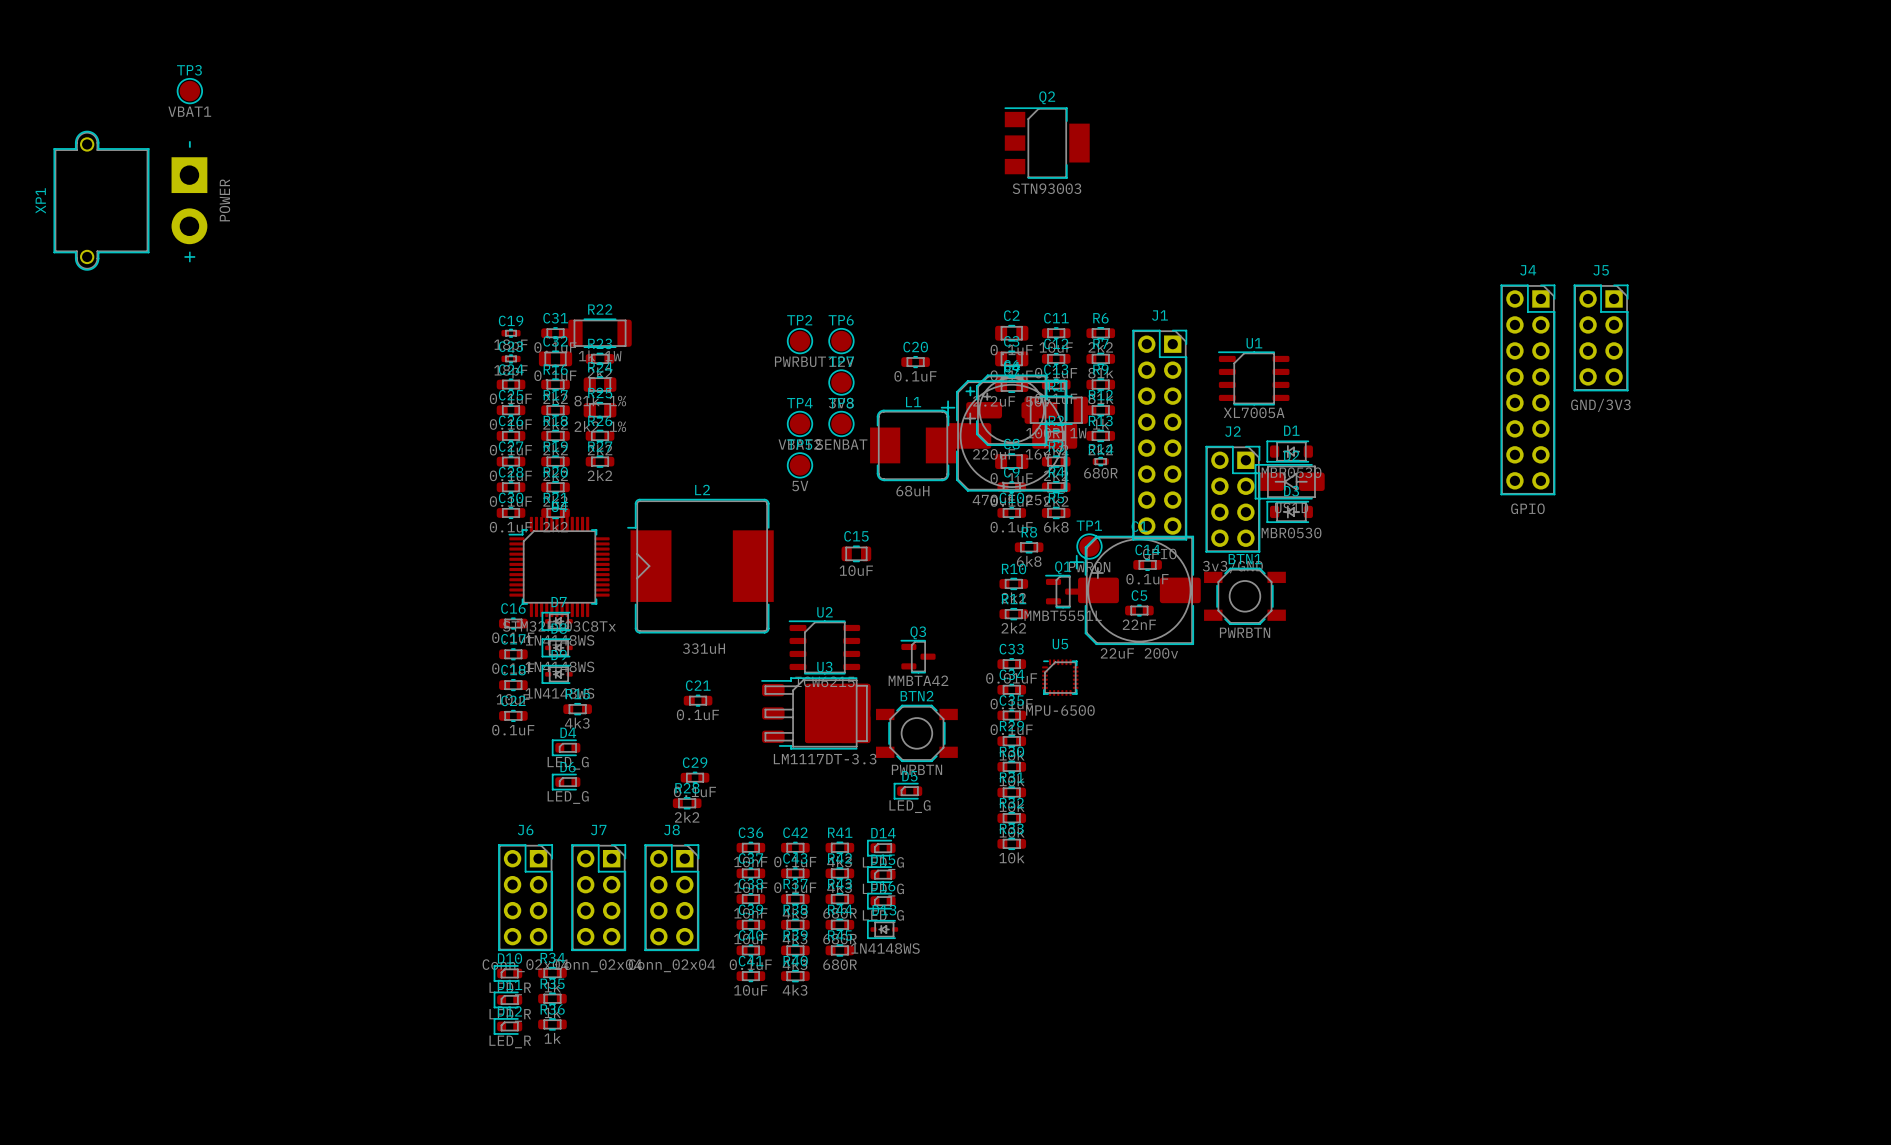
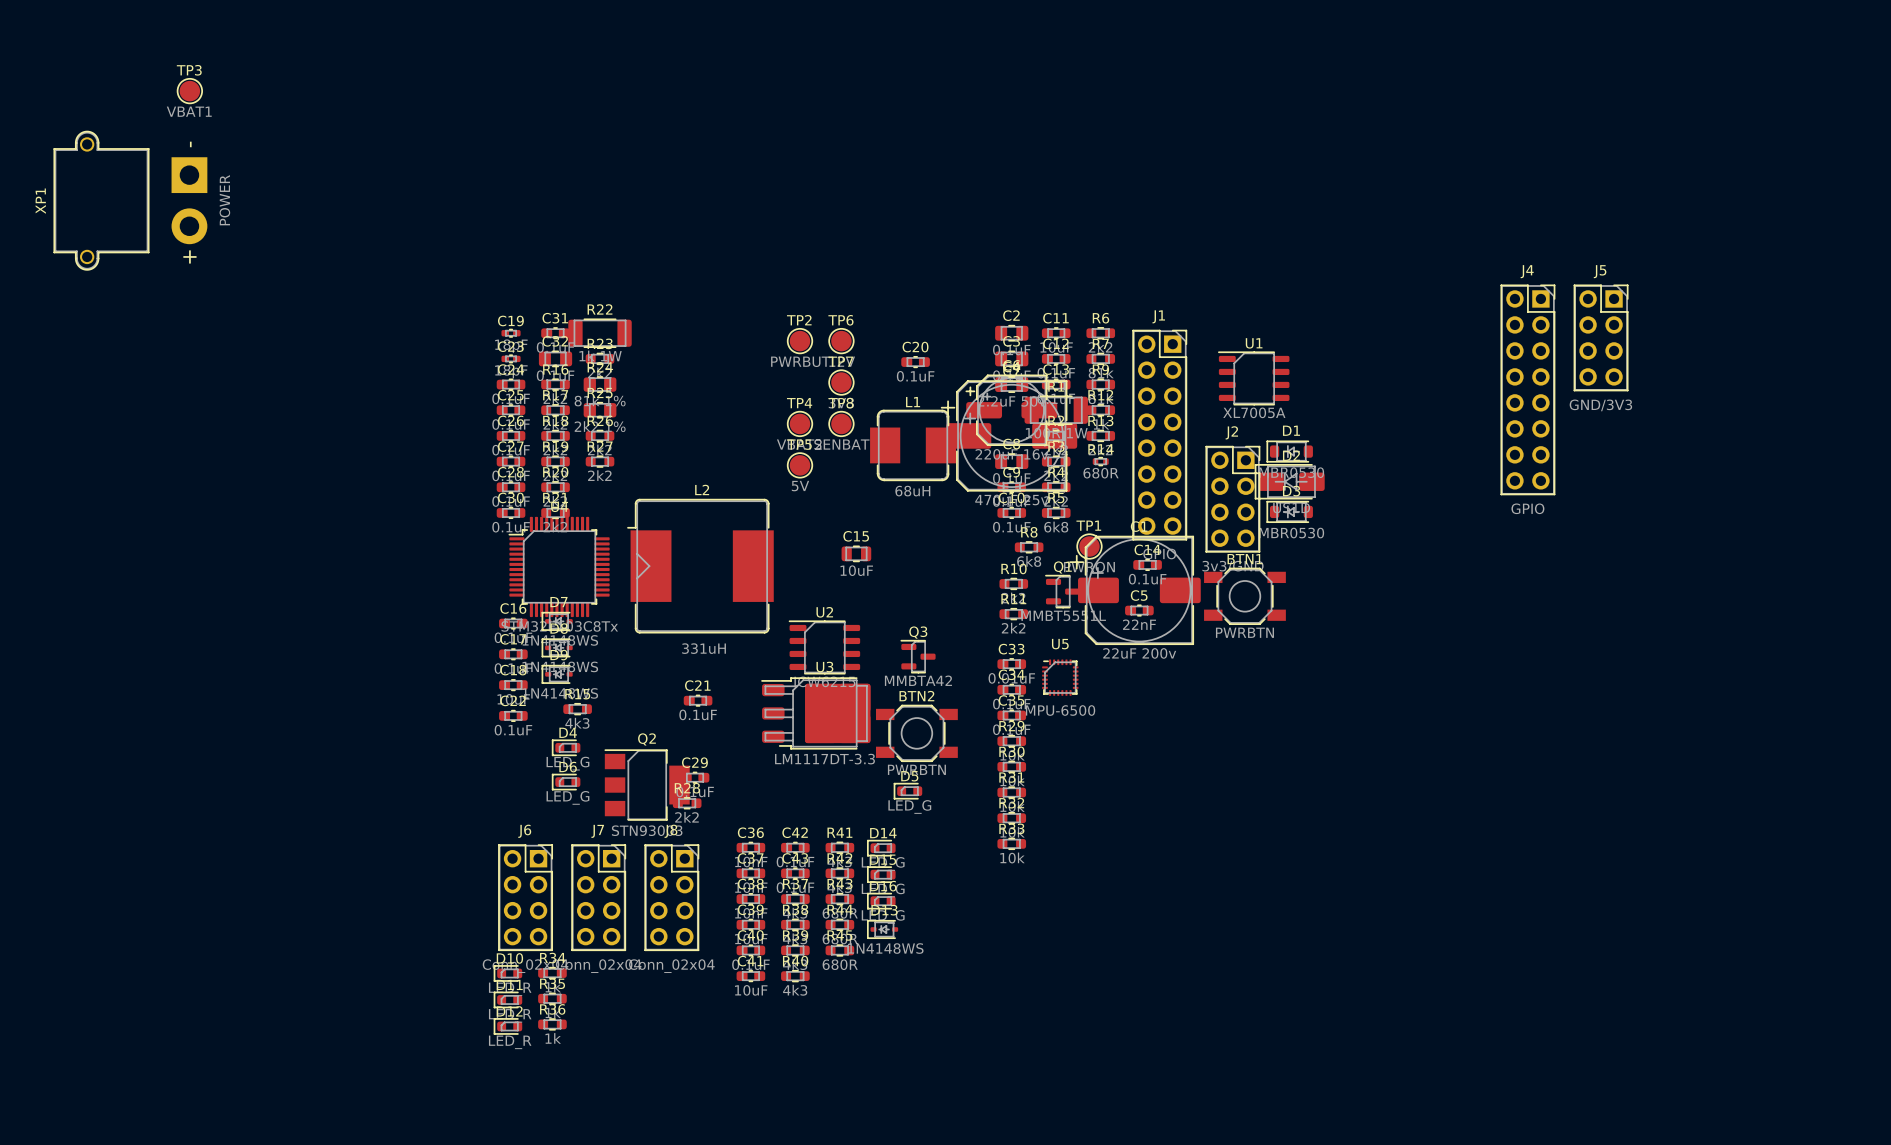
Q2 position: (1047, 143) -> (647, 785)

